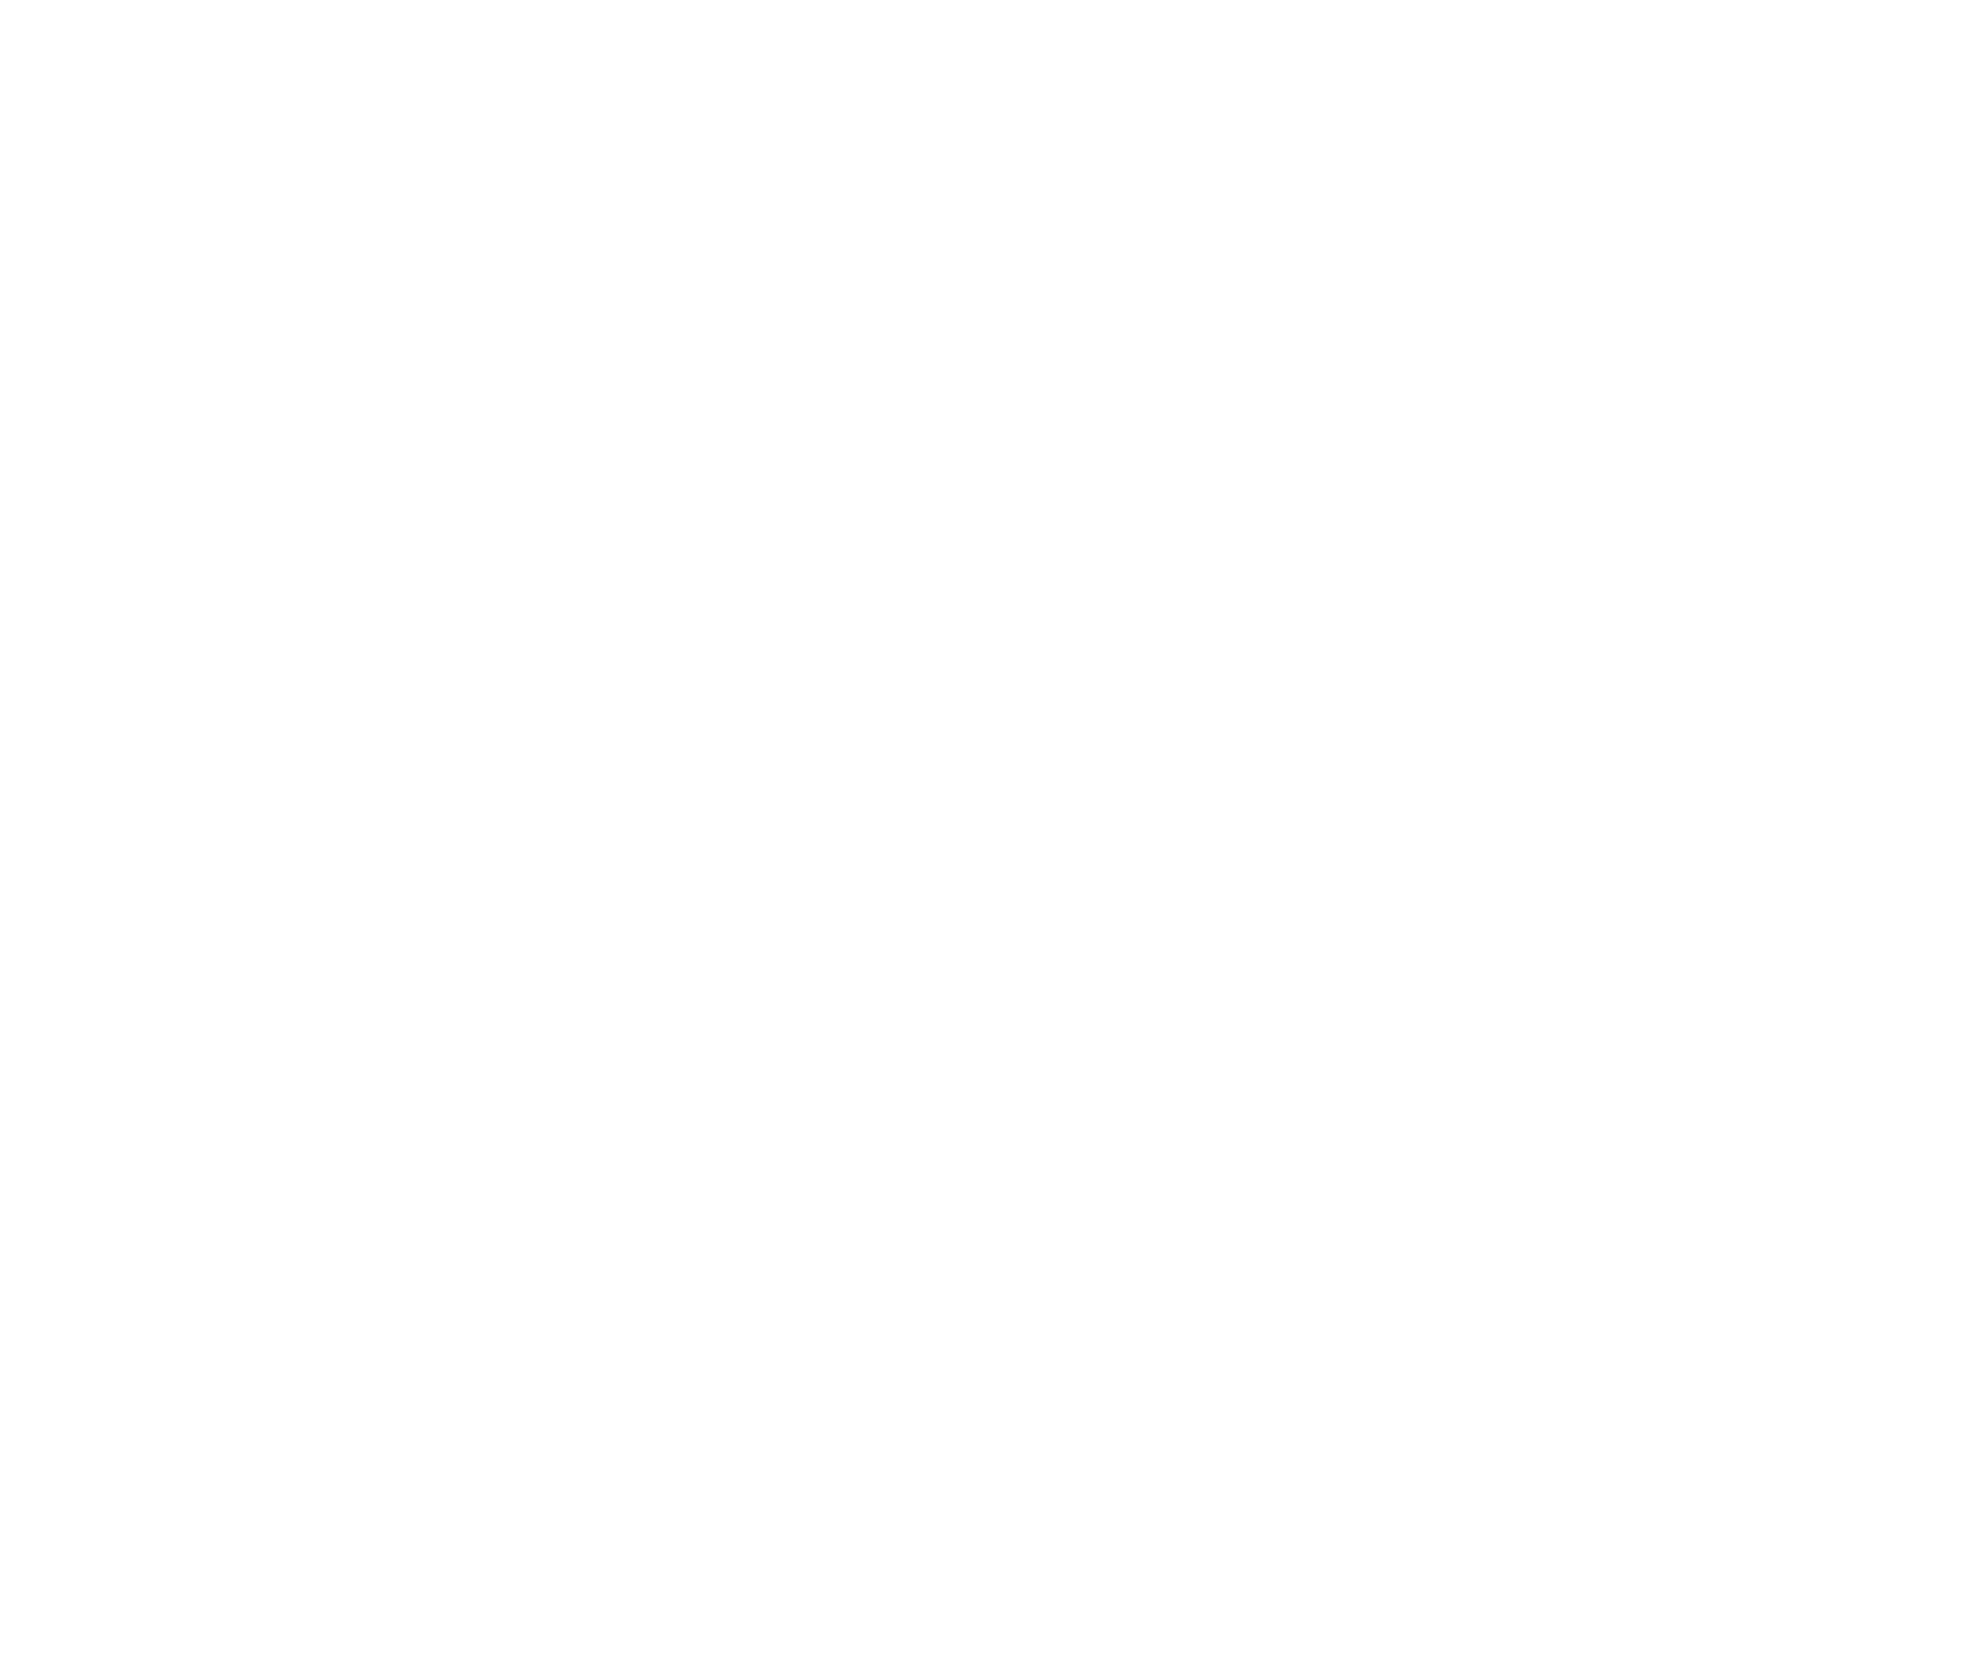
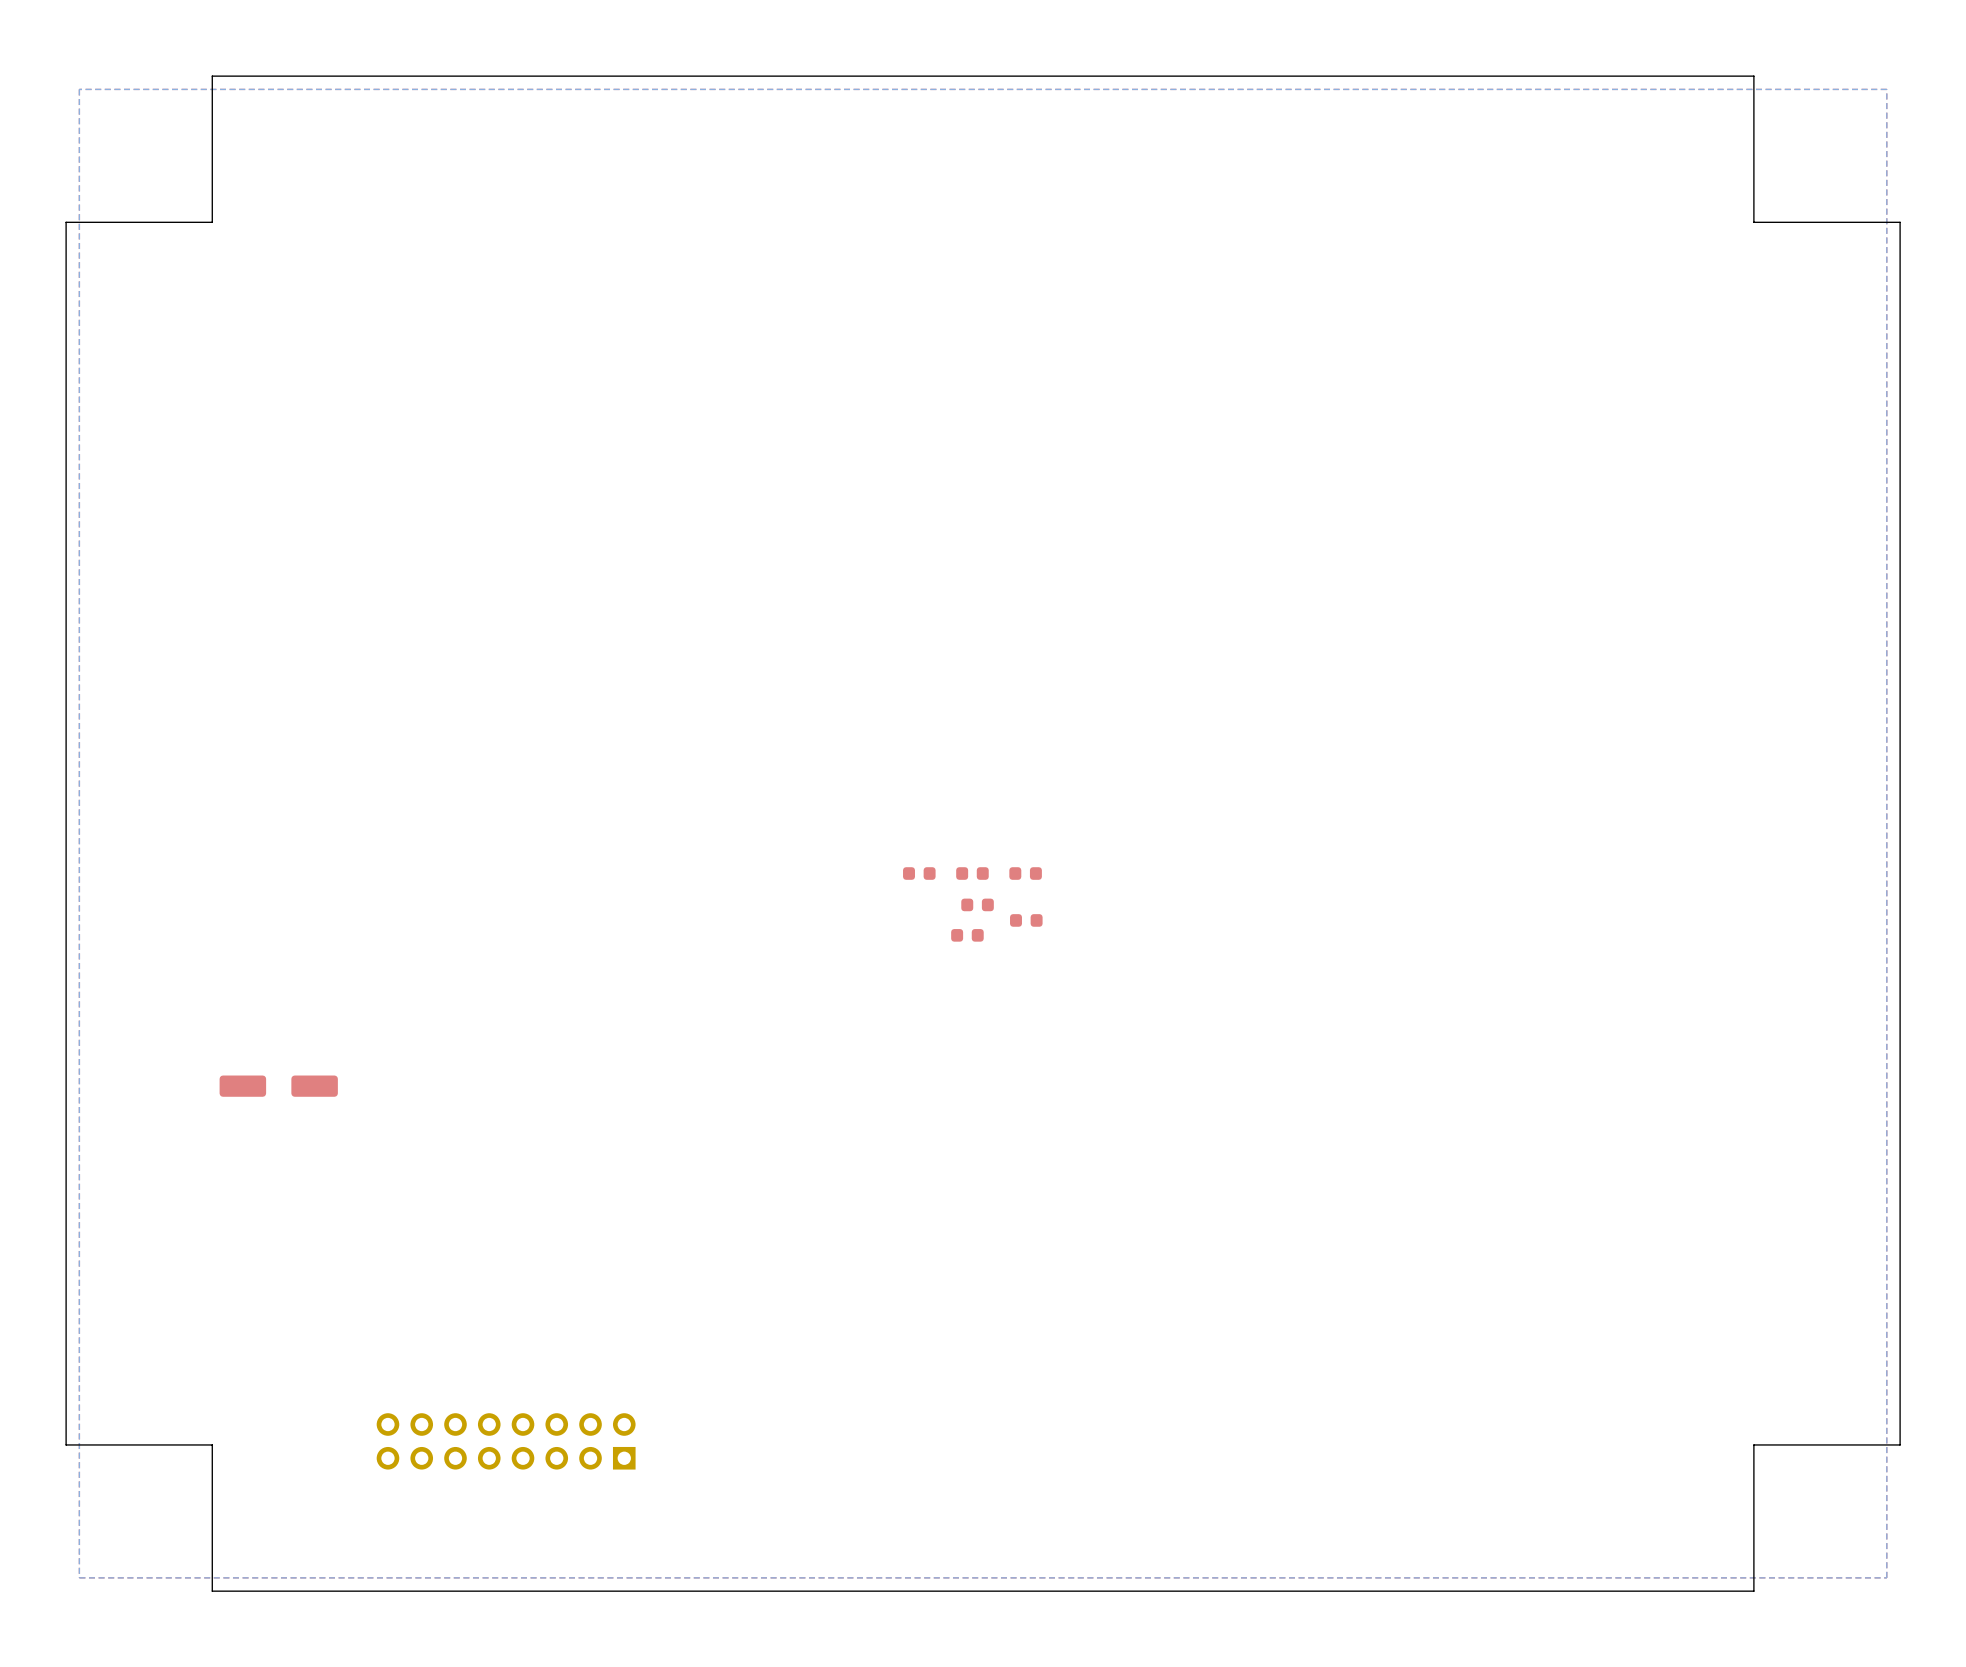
board edge: none -> (1753, 76) (1753, 222) (1900, 222) (1900, 1444) (1753, 1444) (1753, 1591) (212, 1591) (212, 1444) (66, 1444) (66, 222) (212, 222) (212, 76) (1753, 76)
bottom zone outline: none -> (1886, 89) (79, 89) (79, 1577) (1886, 1577) (1886, 89)
part: none -> (919, 873)
part: none -> (972, 873)
part: none -> (1025, 873)
part: none -> (977, 904)
part: none -> (1026, 920)
part: none -> (967, 935)
part: none -> (278, 1086)
part: none -> (506, 1441)

